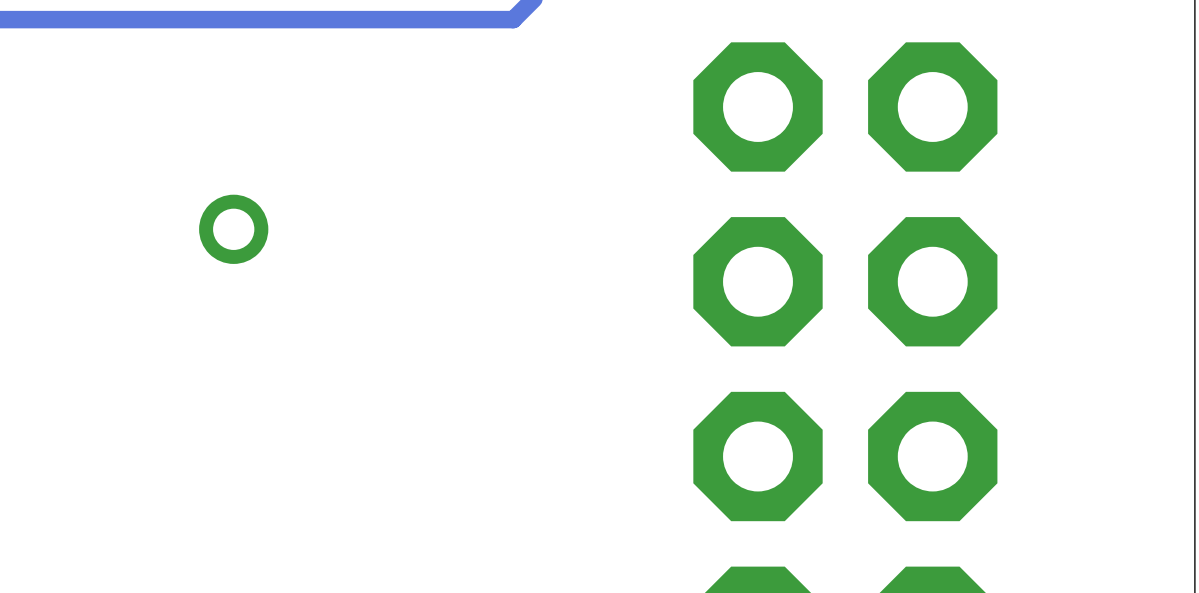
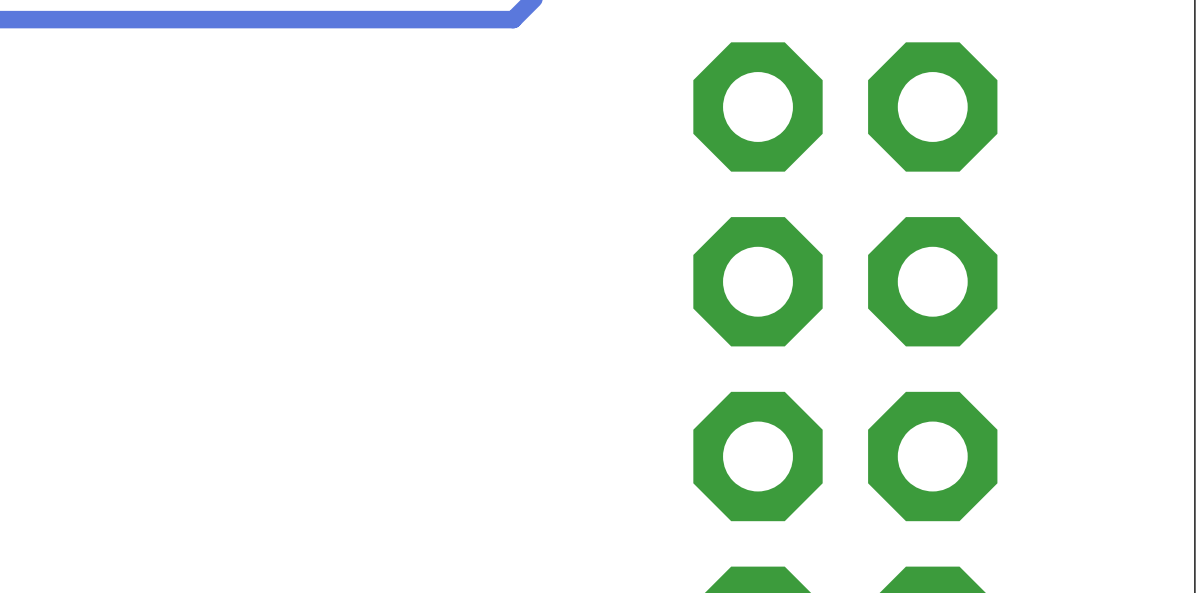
via: (233, 229) -> none

